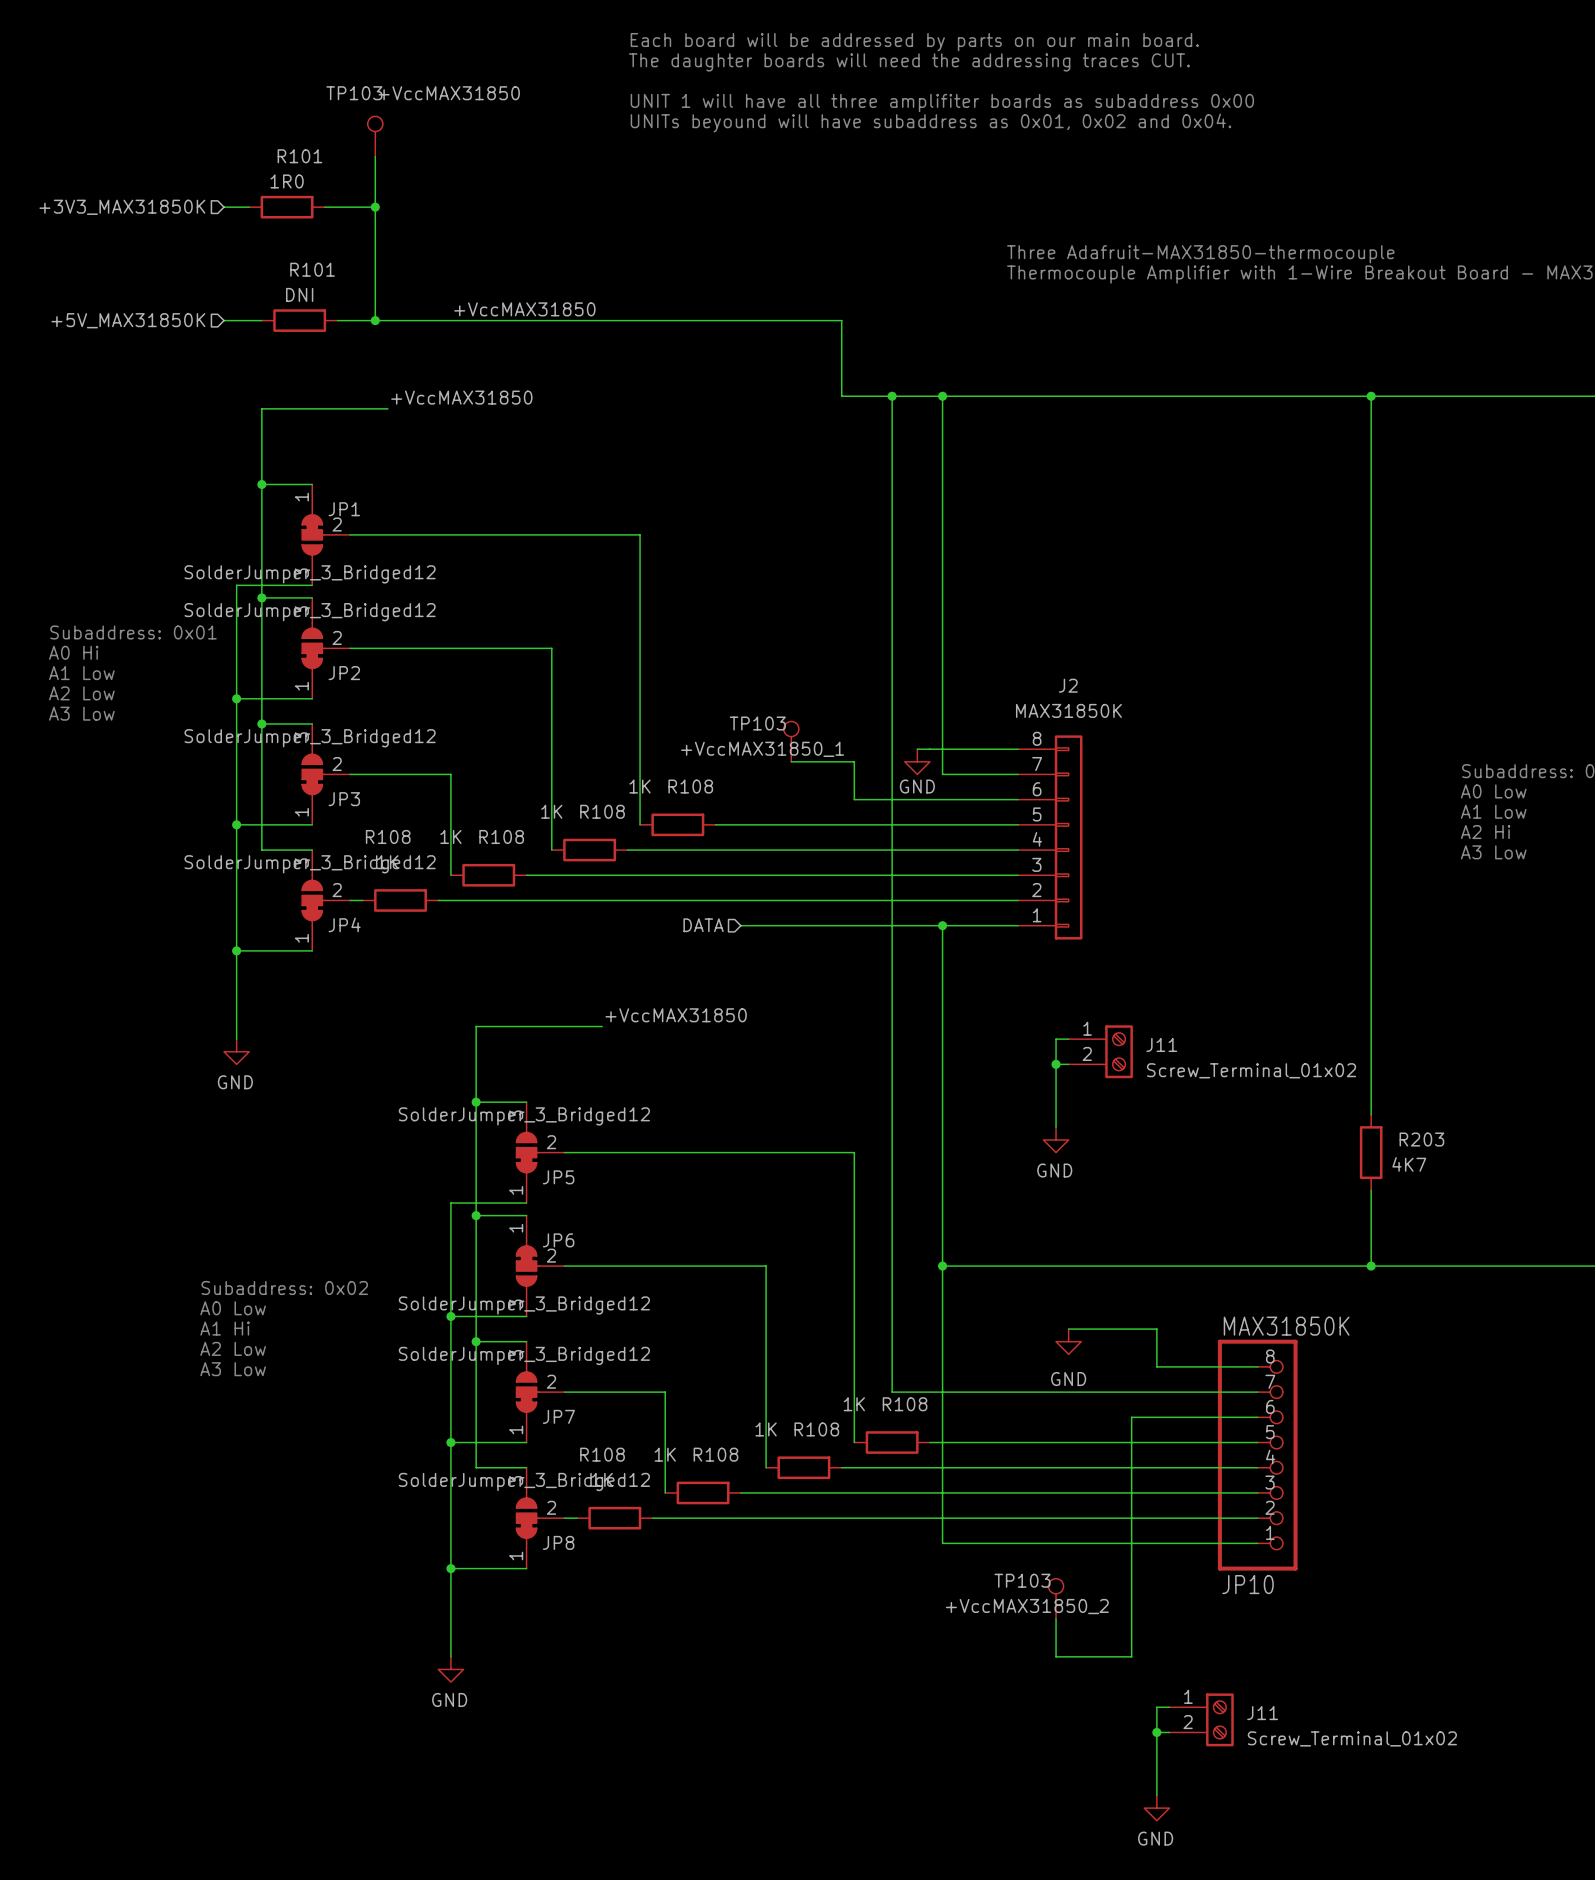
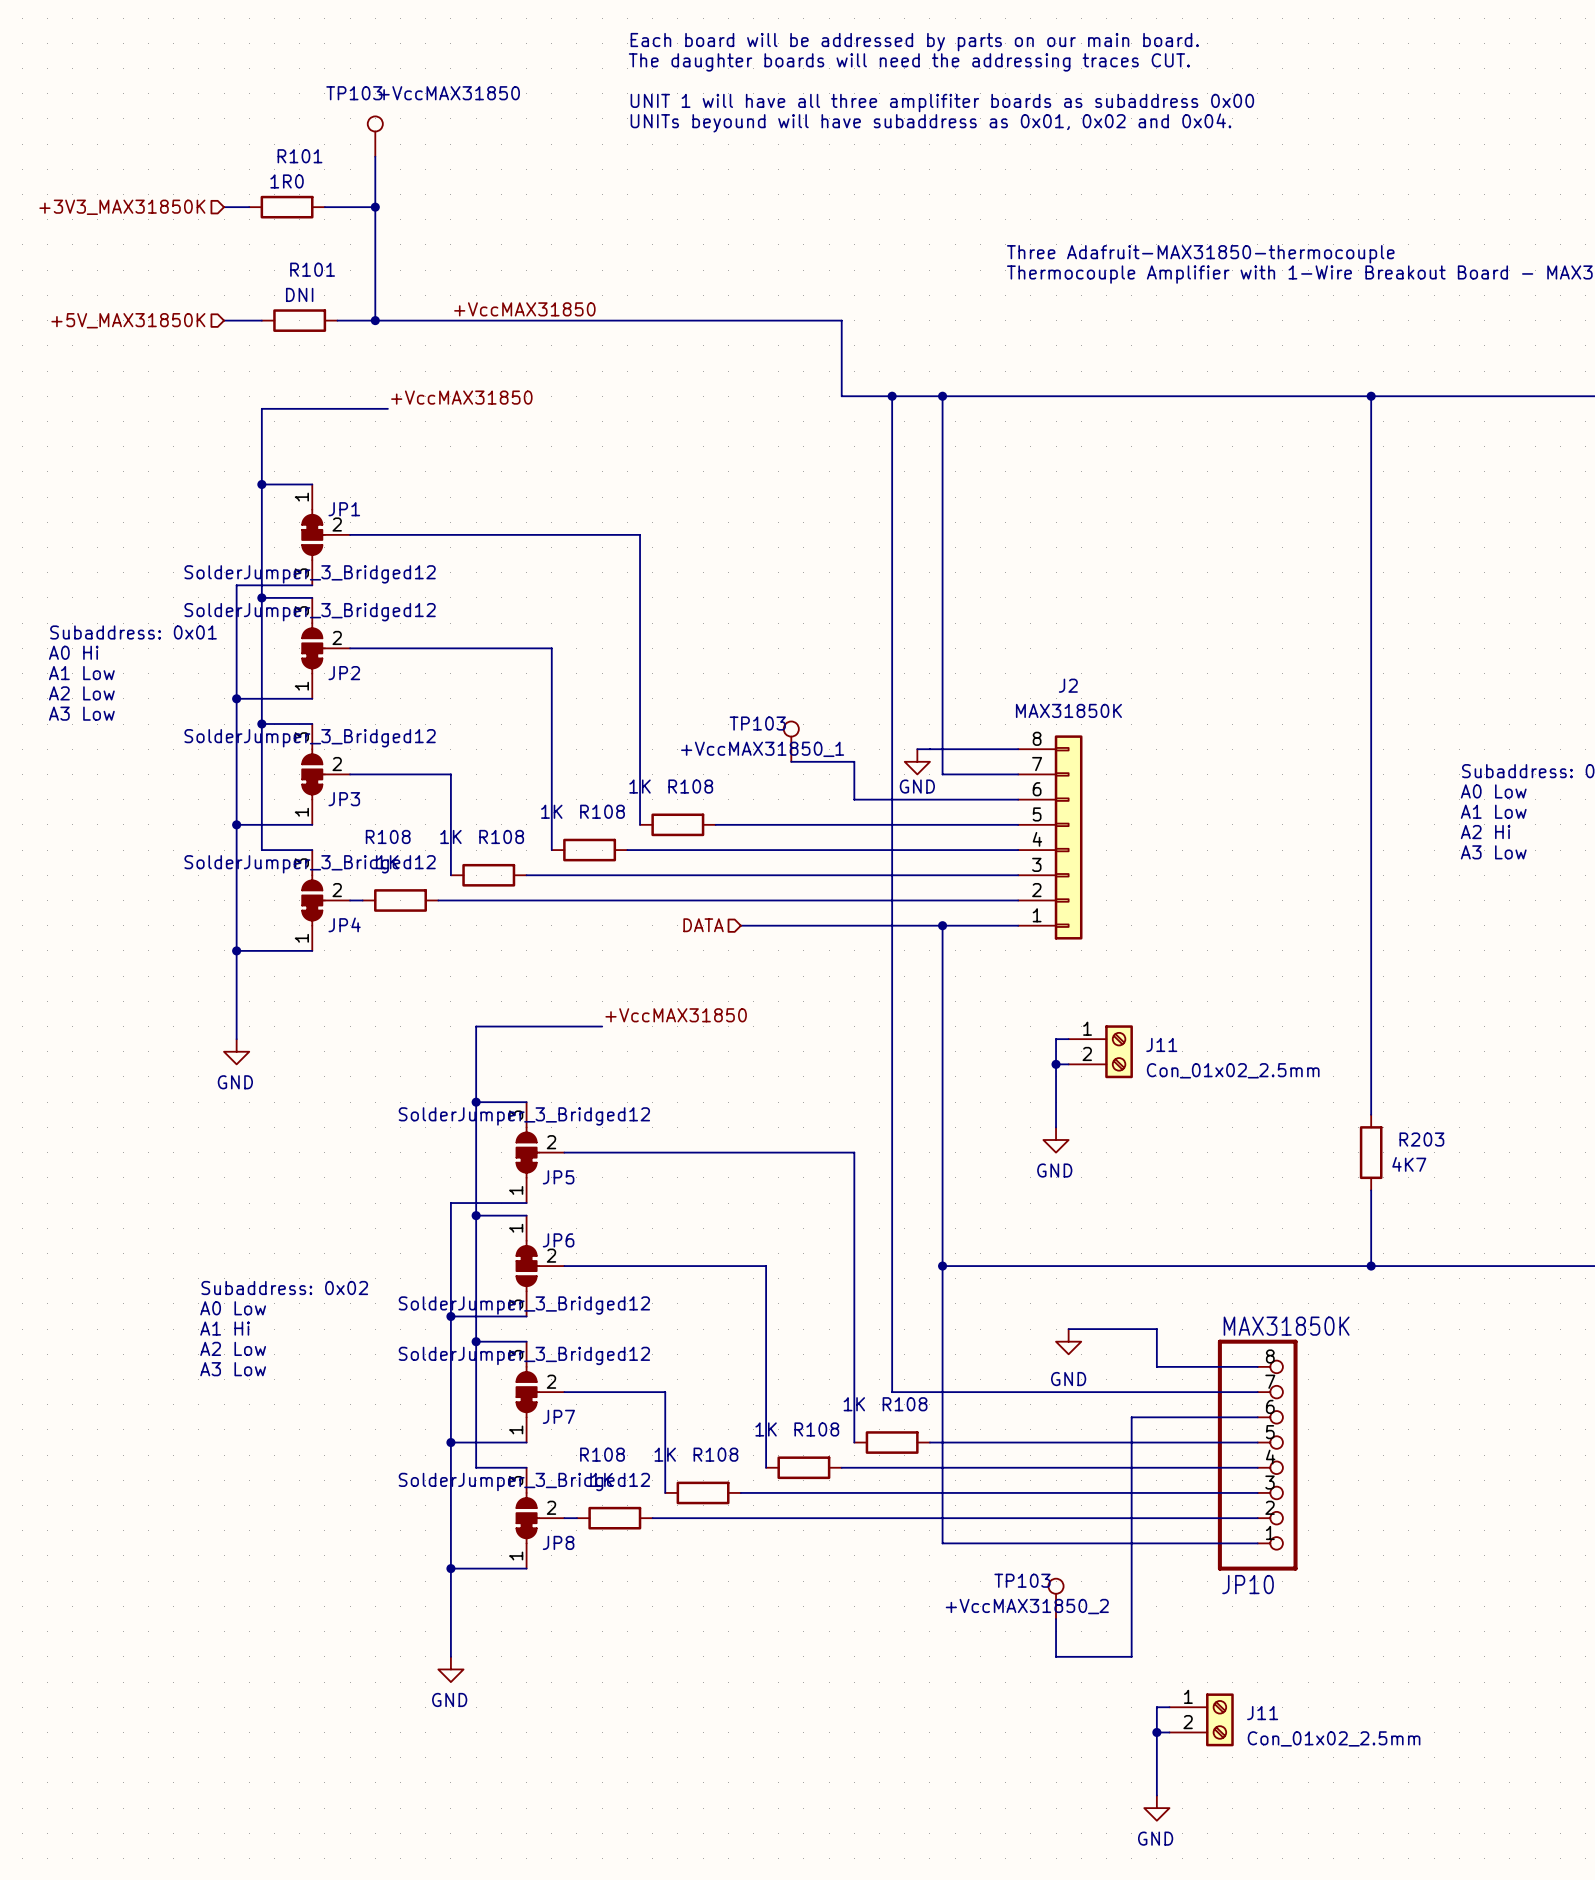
J11 value: Screw_Terminal_01x02 (1251, 1070) -> Con_01x02_2.5mm (1233, 1070)
J11 value: Screw_Terminal_01x02 (1352, 1738) -> Con_01x02_2.5mm (1334, 1738)

